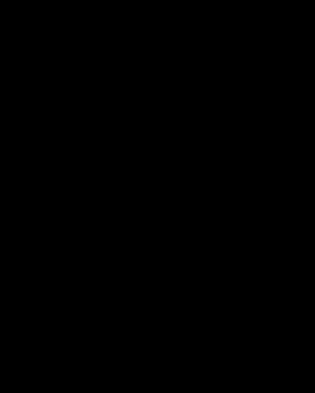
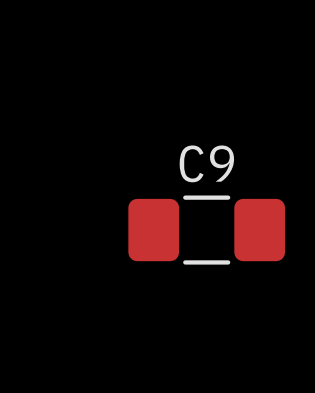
C9: none -> (206, 230)

